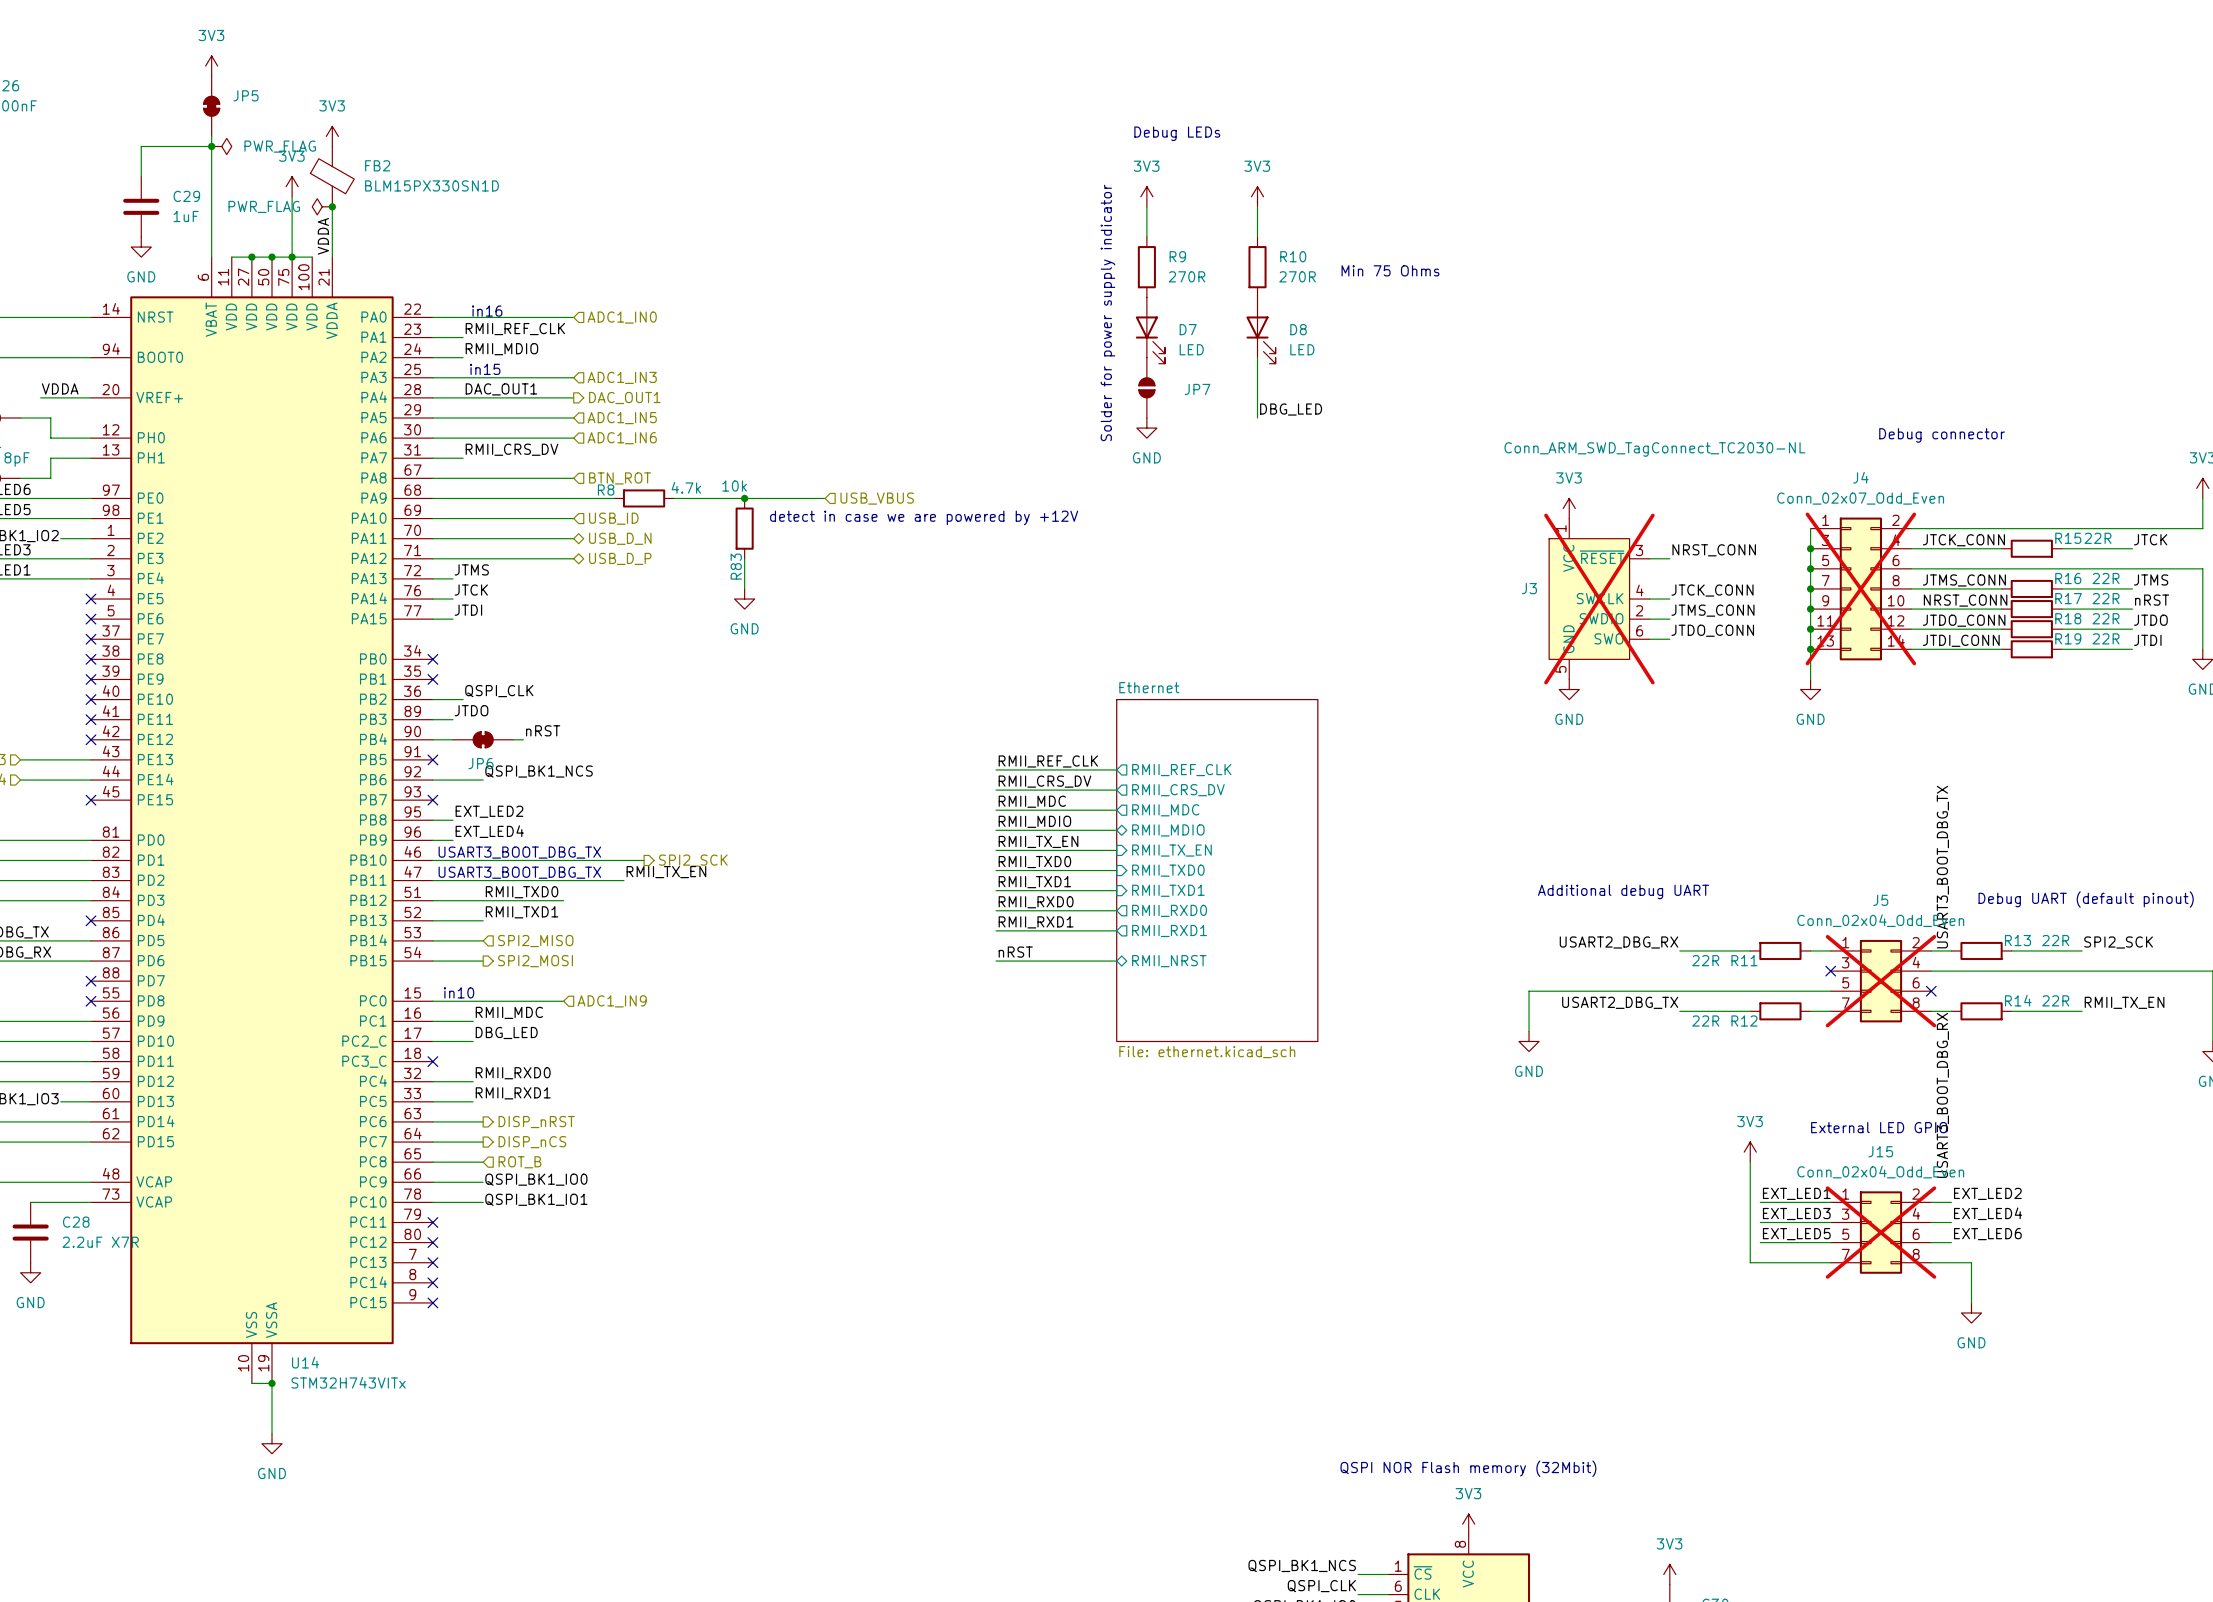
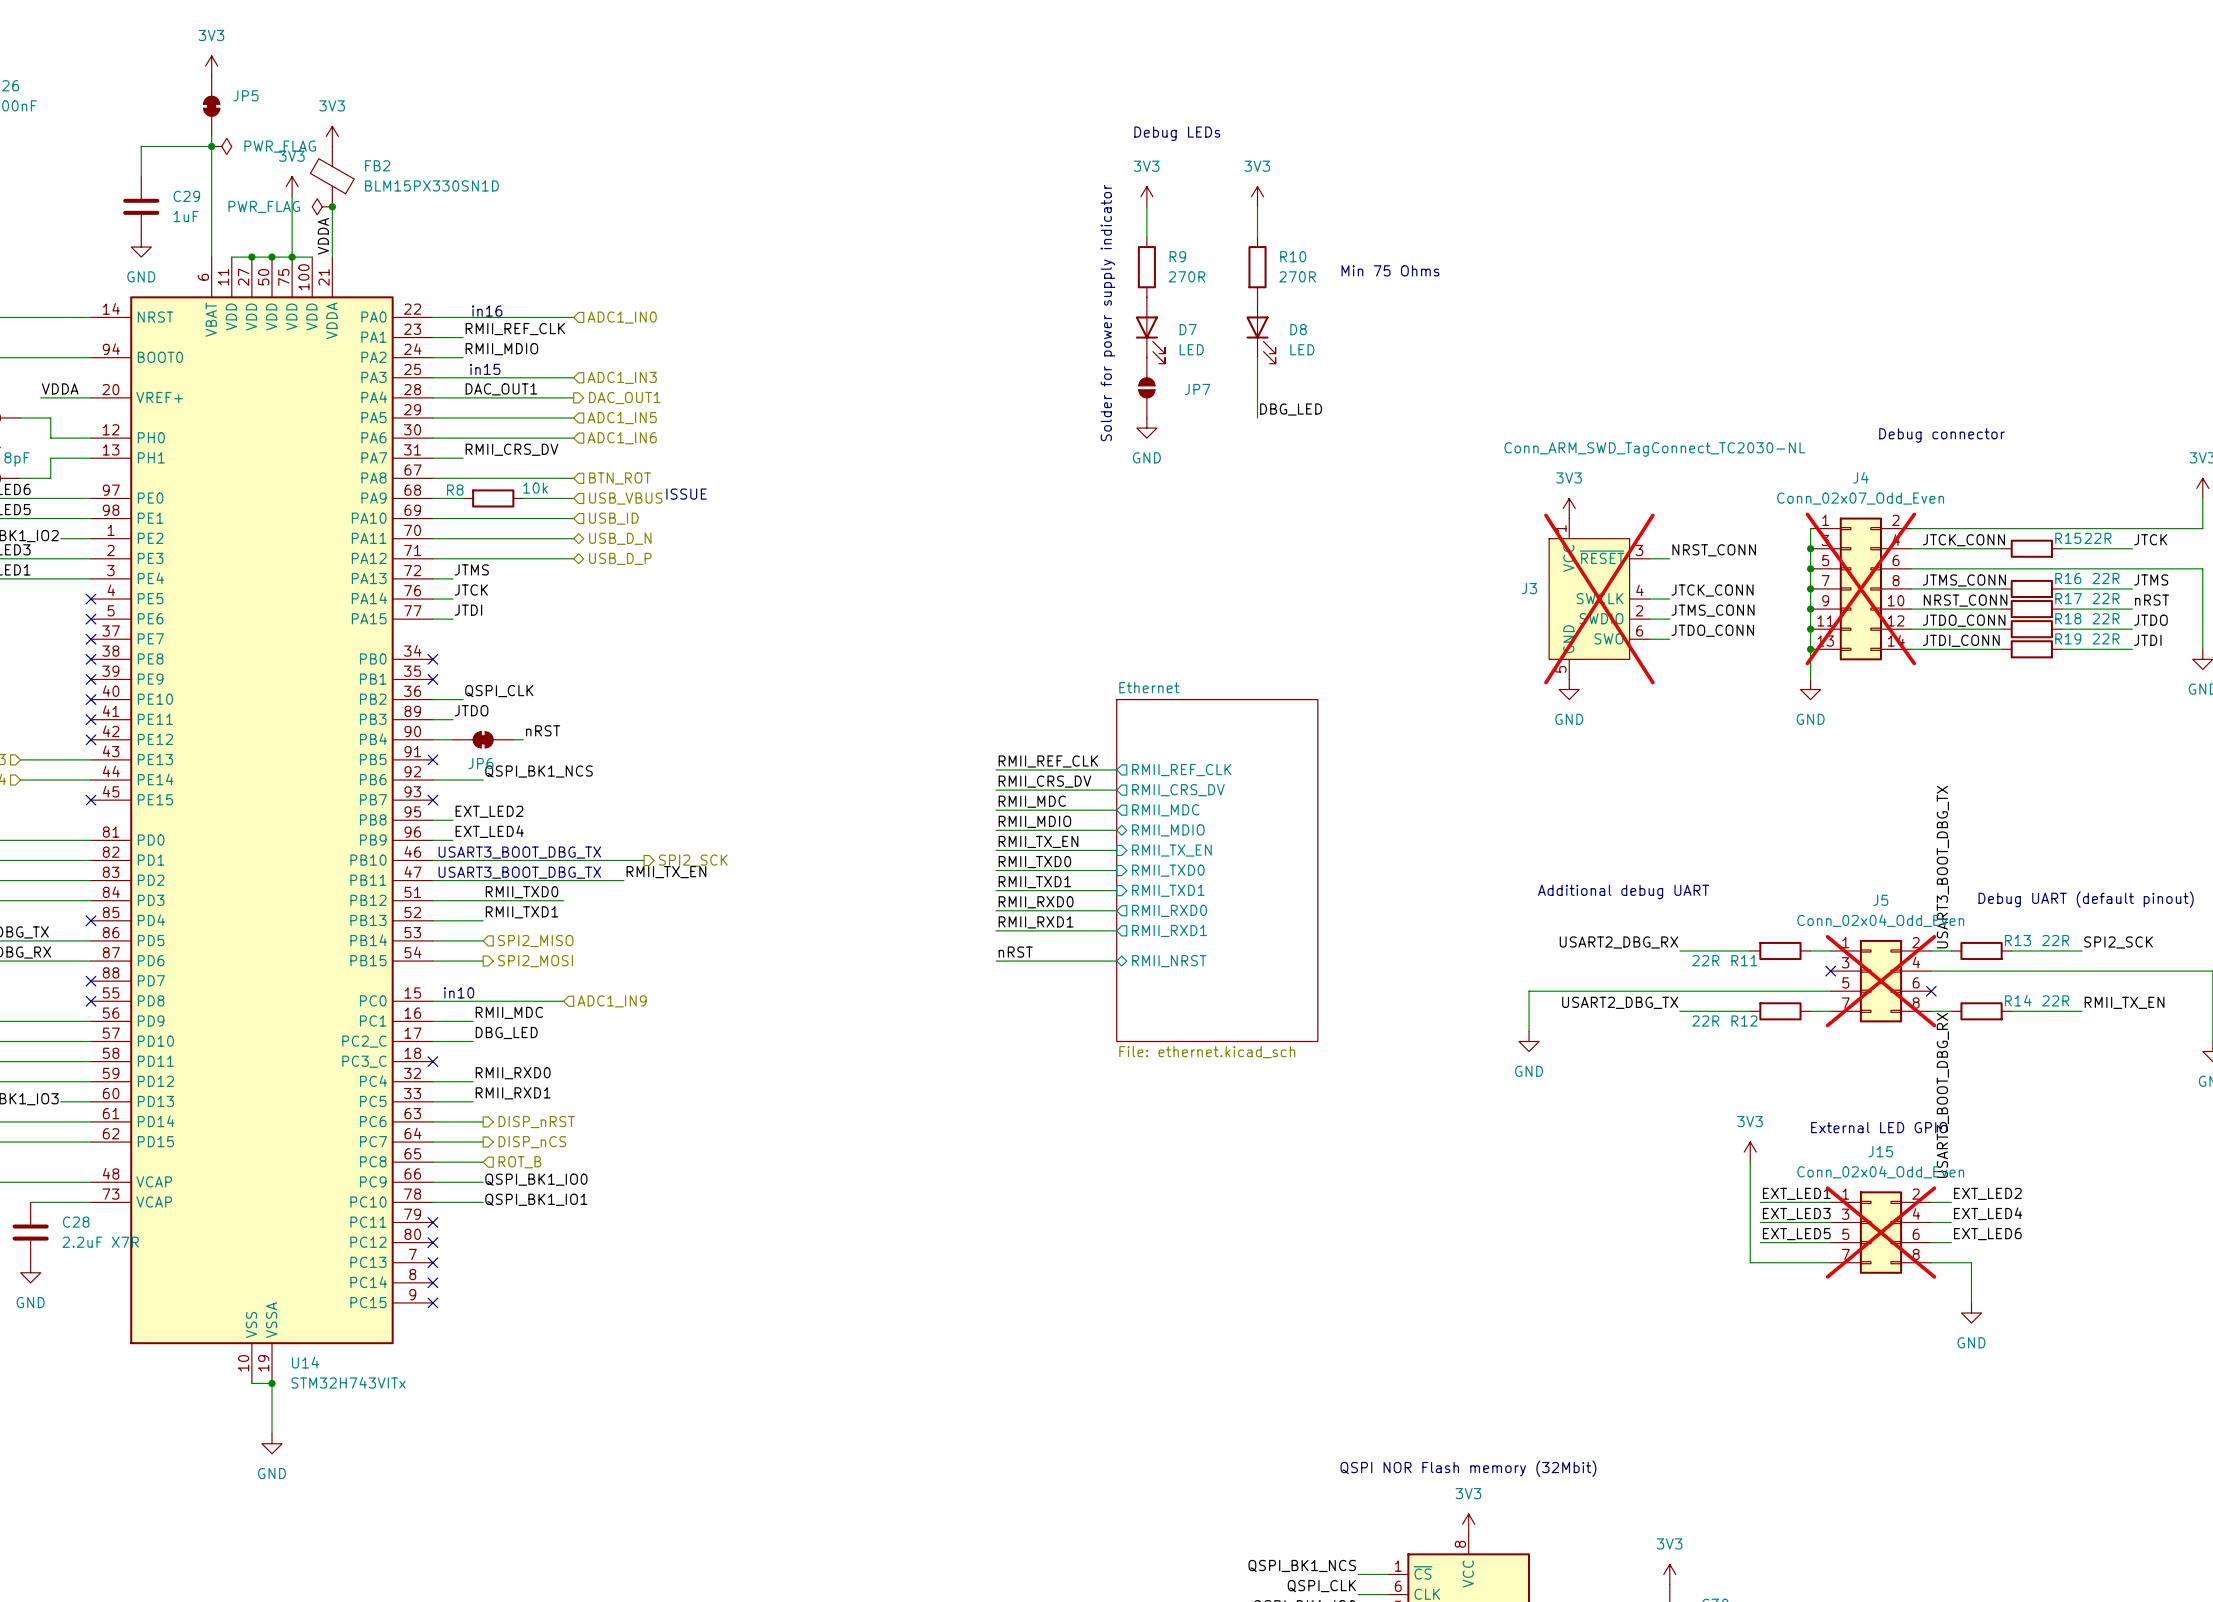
R8 value: 4.7k (686, 487) -> 10k (535, 488)
text: none -> ISSUE (686, 494)
wire: (463, 498) (523, 498) -> none
wire: (573, 498) (613, 498) -> none
hierarchical label: none -> USB_VBUS (625, 498)
R8 position: (644, 498) -> (493, 498)
wire: (674, 498) (825, 498) -> none
junction: (744, 498) -> none
hierarchical label: USB_VBUS (877, 498) -> none
text: detect in case we are powered by +12V (924, 517) -> none
R83: 10k (744, 528) -> none
wire: (744, 558) (744, 588) -> none
power symbol: GND (744, 599) -> none

